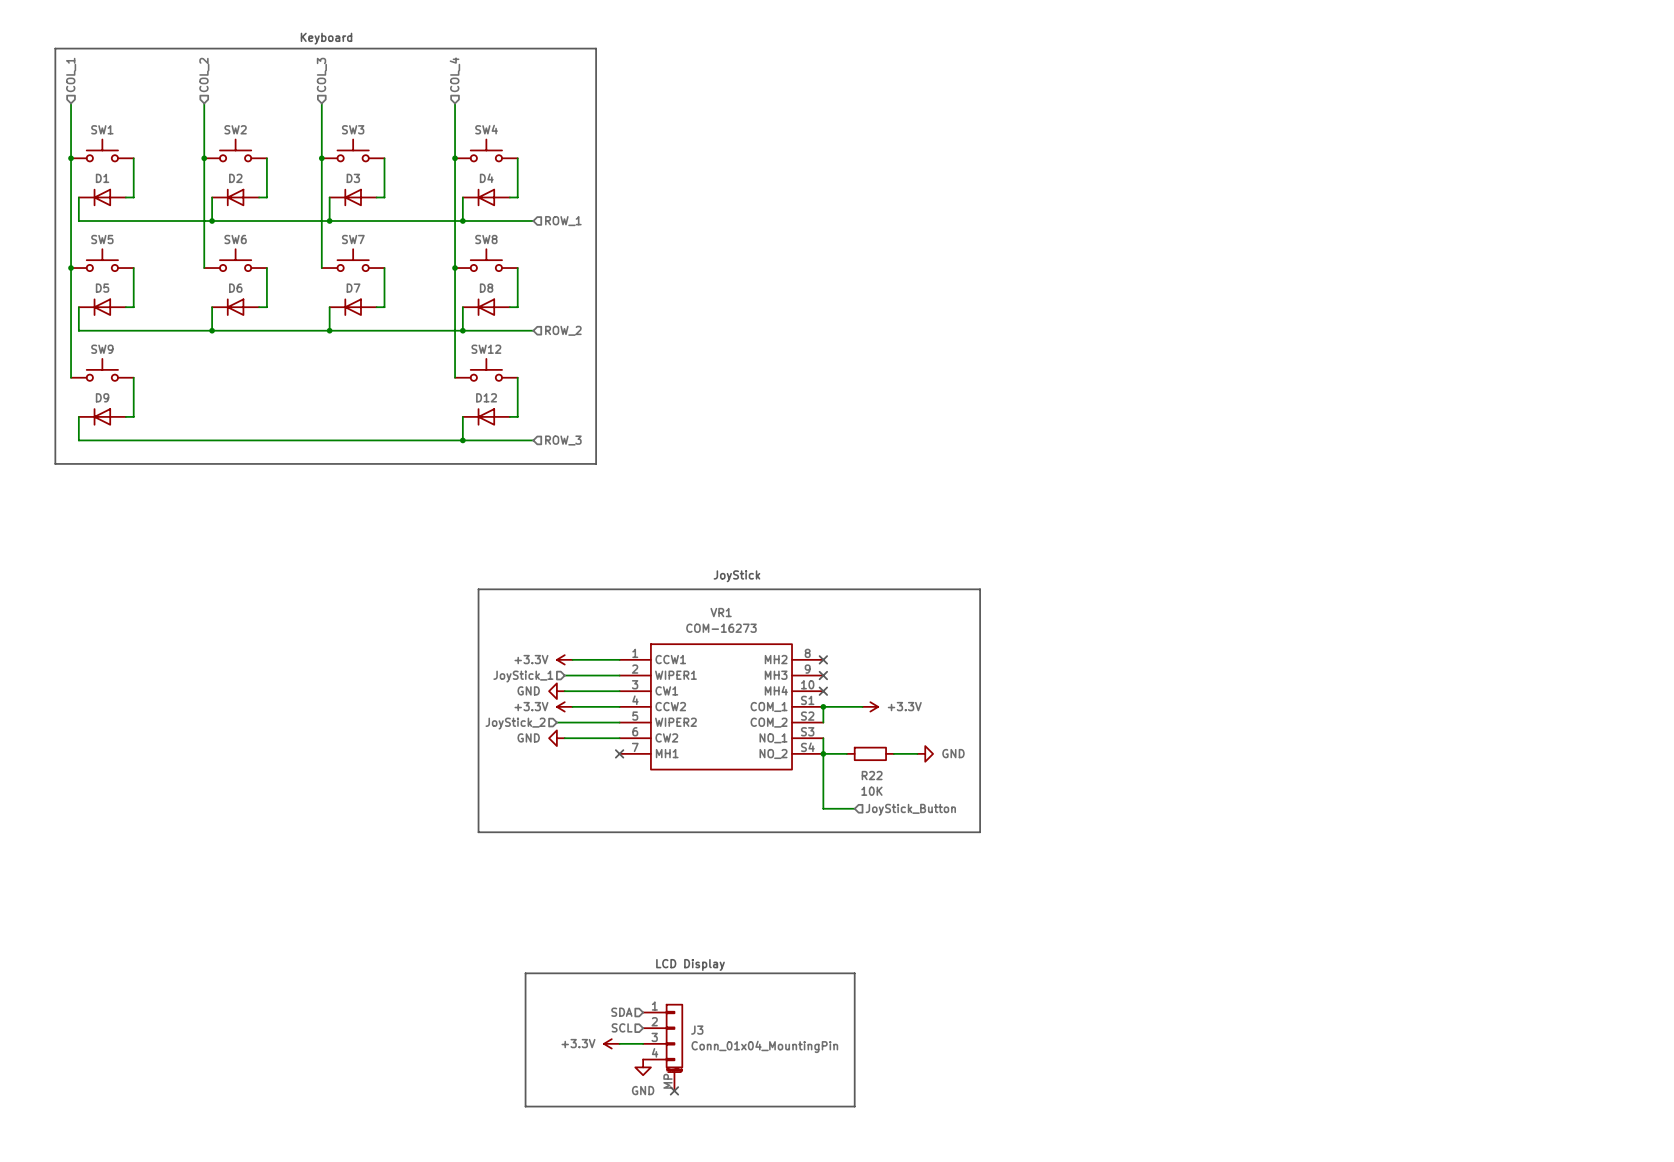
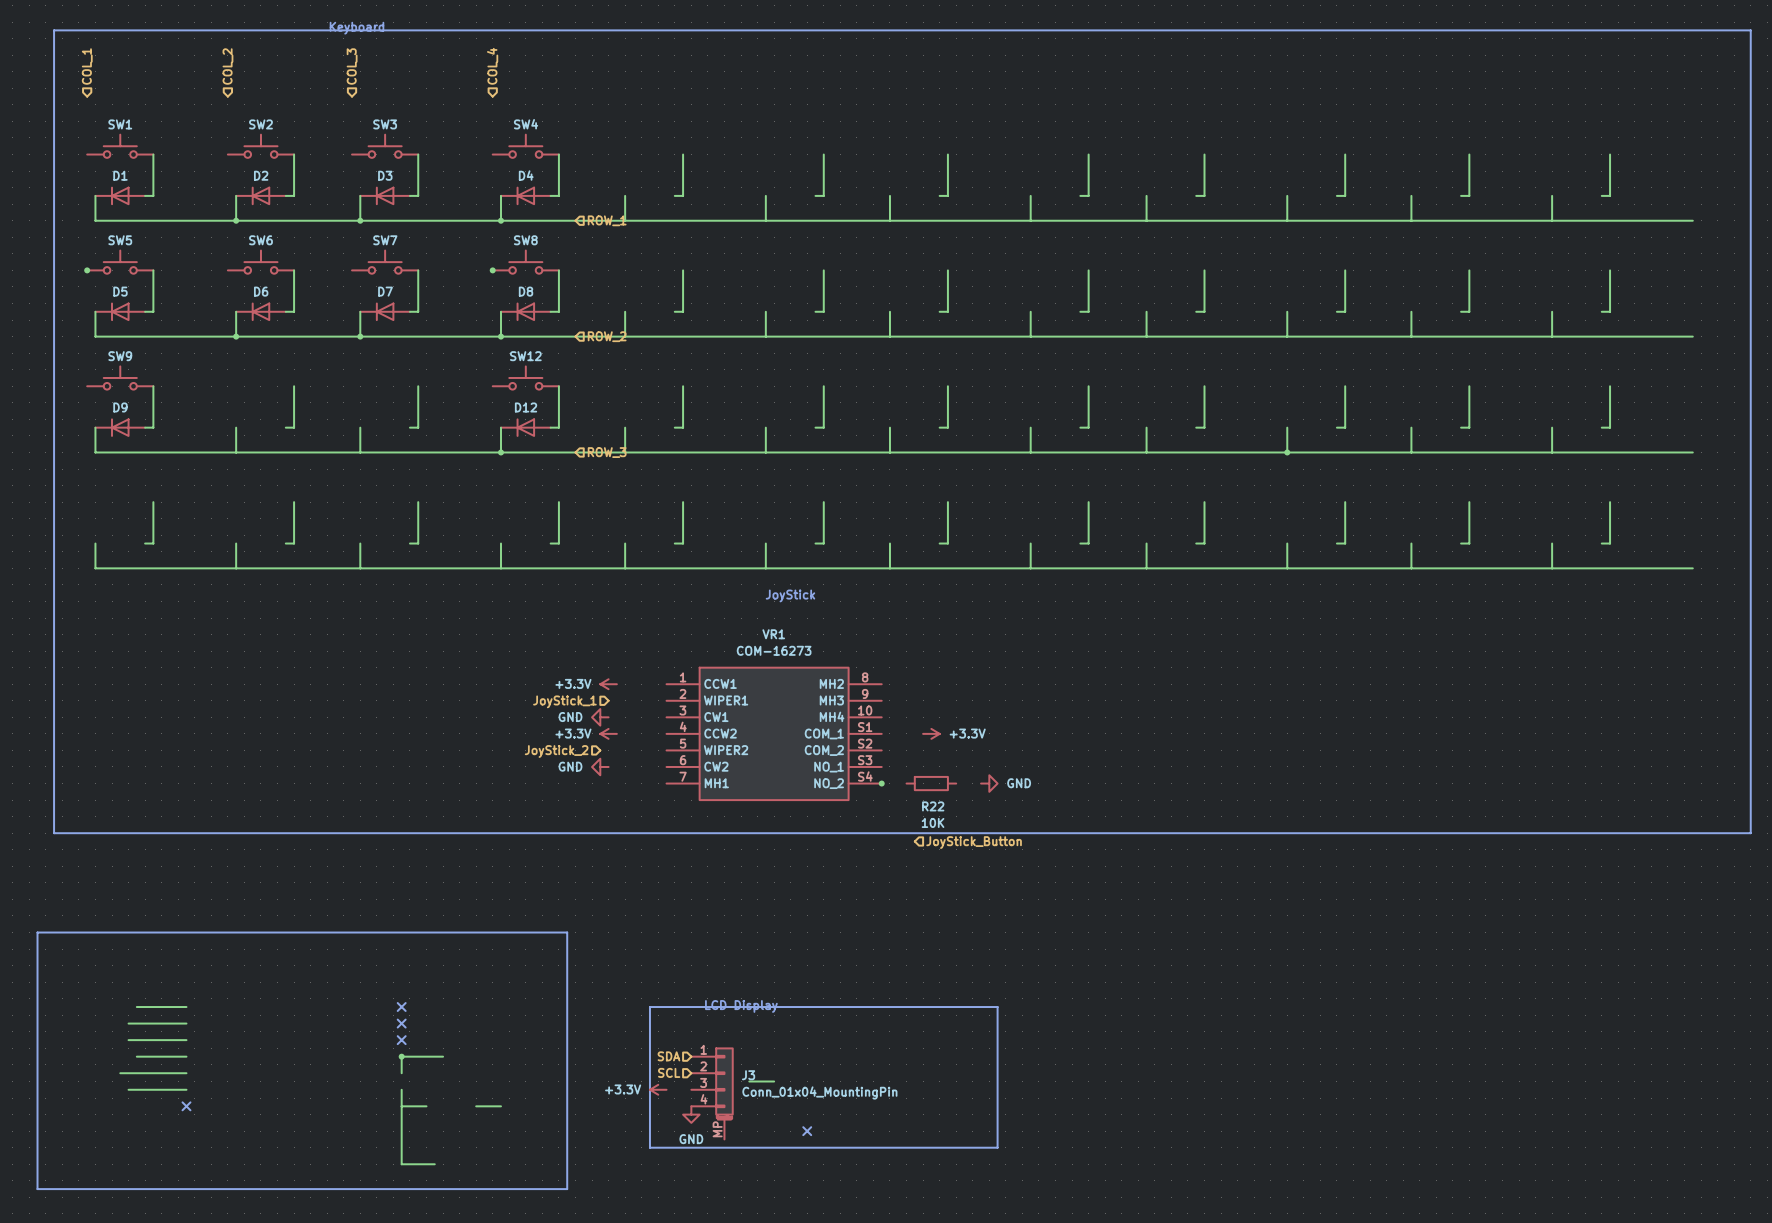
line: none -> (54, 30) (1750, 30) (1750, 833) (54, 833) (54, 30)
line: (55, 48) (596, 48) (596, 463) (55, 463) (55, 48) -> none
wire: (71, 103) (71, 377) -> none
wire: (204, 103) (204, 268) -> none
wire: (321, 103) (321, 268) -> none
wire: (455, 103) (455, 377) -> none
junction: (71, 158) -> none
junction: (204, 158) -> none
junction: (321, 158) -> none
junction: (455, 158) -> none
wire: none -> (683, 154) (683, 195) (674, 195)
wire: none -> (823, 154) (823, 195) (815, 195)
wire: none -> (947, 154) (947, 195) (939, 195)
wire: none -> (1088, 154) (1088, 195) (1080, 195)
wire: none -> (1204, 154) (1204, 195) (1196, 195)
wire: none -> (1345, 154) (1345, 195) (1336, 195)
wire: none -> (1469, 154) (1469, 195) (1461, 195)
wire: none -> (1610, 154) (1610, 195) (1601, 195)
wire: none -> (625, 195) (625, 220)
wire: none -> (765, 195) (765, 220)
wire: none -> (889, 195) (889, 220)
wire: none -> (1030, 195) (1030, 220)
wire: none -> (1146, 195) (1146, 220)
wire: none -> (1287, 195) (1287, 220)
wire: none -> (1411, 195) (1411, 220)
wire: none -> (1552, 195) (1552, 220)
wire: none -> (575, 220) (1692, 220)
wire: none -> (683, 270) (683, 311) (674, 311)
wire: none -> (823, 270) (823, 311) (815, 311)
wire: none -> (947, 270) (947, 311) (939, 311)
wire: none -> (1088, 270) (1088, 311) (1080, 311)
wire: none -> (1204, 270) (1204, 311) (1196, 311)
wire: none -> (1345, 270) (1345, 311) (1336, 311)
wire: none -> (1469, 270) (1469, 311) (1461, 311)
wire: none -> (1610, 270) (1610, 311) (1601, 311)
wire: none -> (625, 311) (625, 336)
wire: none -> (765, 311) (765, 336)
wire: none -> (889, 311) (889, 336)
wire: none -> (1030, 311) (1030, 336)
wire: none -> (1146, 311) (1146, 336)
wire: none -> (1287, 311) (1287, 336)
wire: none -> (1411, 311) (1411, 336)
wire: none -> (1552, 311) (1552, 336)
wire: none -> (575, 336) (1692, 336)
wire: none -> (294, 386) (294, 427) (285, 427)
wire: none -> (418, 386) (418, 427) (409, 427)
wire: none -> (683, 386) (683, 427) (674, 427)
wire: none -> (823, 386) (823, 427) (815, 427)
wire: none -> (947, 386) (947, 427) (939, 427)
wire: none -> (1088, 386) (1088, 427) (1080, 427)
wire: none -> (1204, 386) (1204, 427) (1196, 427)
wire: none -> (1345, 386) (1345, 427) (1336, 427)
wire: none -> (1469, 386) (1469, 427) (1461, 427)
wire: none -> (1610, 386) (1610, 427) (1601, 427)
wire: none -> (236, 427) (236, 452)
wire: none -> (360, 427) (360, 452)
wire: none -> (625, 427) (625, 452)
wire: none -> (765, 427) (765, 452)
wire: none -> (889, 427) (889, 452)
wire: none -> (1030, 427) (1030, 452)
wire: none -> (1146, 427) (1146, 452)
wire: none -> (1287, 427) (1287, 452)
wire: none -> (1411, 427) (1411, 452)
wire: none -> (1552, 427) (1552, 452)
wire: none -> (575, 452) (1692, 452)
junction: none -> (1287, 452)
wire: none -> (153, 502) (153, 543) (145, 543)
wire: none -> (294, 502) (294, 543) (285, 543)
wire: none -> (418, 502) (418, 543) (409, 543)
wire: none -> (558, 502) (558, 543) (550, 543)
wire: none -> (683, 502) (683, 543) (674, 543)
wire: none -> (823, 502) (823, 543) (815, 543)
wire: none -> (947, 502) (947, 543) (939, 543)
wire: none -> (1088, 502) (1088, 543) (1080, 543)
wire: none -> (1204, 502) (1204, 543) (1196, 543)
wire: none -> (1345, 502) (1345, 543) (1336, 543)
wire: none -> (1469, 502) (1469, 543) (1461, 543)
wire: none -> (1610, 502) (1610, 543) (1601, 543)
wire: none -> (95, 543) (95, 568) (1692, 568)
wire: none -> (236, 543) (236, 568)
wire: none -> (360, 543) (360, 568)
wire: none -> (500, 543) (500, 568)
wire: none -> (625, 543) (625, 568)
wire: none -> (765, 543) (765, 568)
wire: none -> (889, 543) (889, 568)
wire: none -> (1030, 543) (1030, 568)
wire: none -> (1146, 543) (1146, 568)
wire: none -> (1287, 543) (1287, 568)
wire: none -> (1411, 543) (1411, 568)
wire: none -> (1552, 543) (1552, 568)
line: (478, 589) (980, 589) (980, 832) (478, 832) (478, 589) -> none
wire: (572, 659) (619, 659) -> none
no-connect mark: (823, 659) -> none
wire: (564, 675) (619, 675) -> none
no-connect mark: (823, 675) -> none
wire: (564, 691) (619, 691) -> none
no-connect mark: (823, 691) -> none
wire: (572, 706) (619, 706) -> none
junction: (823, 706) -> none
wire: (862, 706) (823, 706) (823, 722) -> none
wire: (556, 722) (619, 722) -> none
wire: (564, 738) (619, 738) -> none
wire: (823, 738) (823, 808) (854, 808) -> none
no-connect mark: (619, 753) -> none
wire: (823, 753) (846, 753) -> none
wire: (893, 753) (917, 753) -> none
wire: none -> (136, 1007) (186, 1007)
no-connect mark: none -> (401, 1007)
line: none -> (649, 1007) (997, 1007) (997, 1147) (649, 1147) (649, 1007)
line: (525, 973) (854, 973) (854, 1106) (525, 1106) -> (567, 1015) (567, 932) (37, 932) (37, 1189) (567, 1189) (567, 1155)
wire: none -> (128, 1023) (186, 1023)
no-connect mark: none -> (401, 1023)
wire: none -> (128, 1040) (186, 1040)
no-connect mark: none -> (401, 1040)
wire: none -> (136, 1056) (186, 1056)
junction: none -> (401, 1056)
wire: none -> (443, 1056) (401, 1056) (401, 1073)
wire: none -> (120, 1073) (186, 1073)
wire: none -> (128, 1089) (186, 1089)
wire: none -> (401, 1089) (401, 1164) (434, 1164)
wire: (619, 1043) (643, 1043) -> (749, 1081) (774, 1081)
no-connect mark: none -> (186, 1106)
wire: none -> (401, 1106) (426, 1106)
wire: none -> (476, 1106) (500, 1106)
no-connect mark: none -> (807, 1131)
no-connect mark: (674, 1090) -> none

